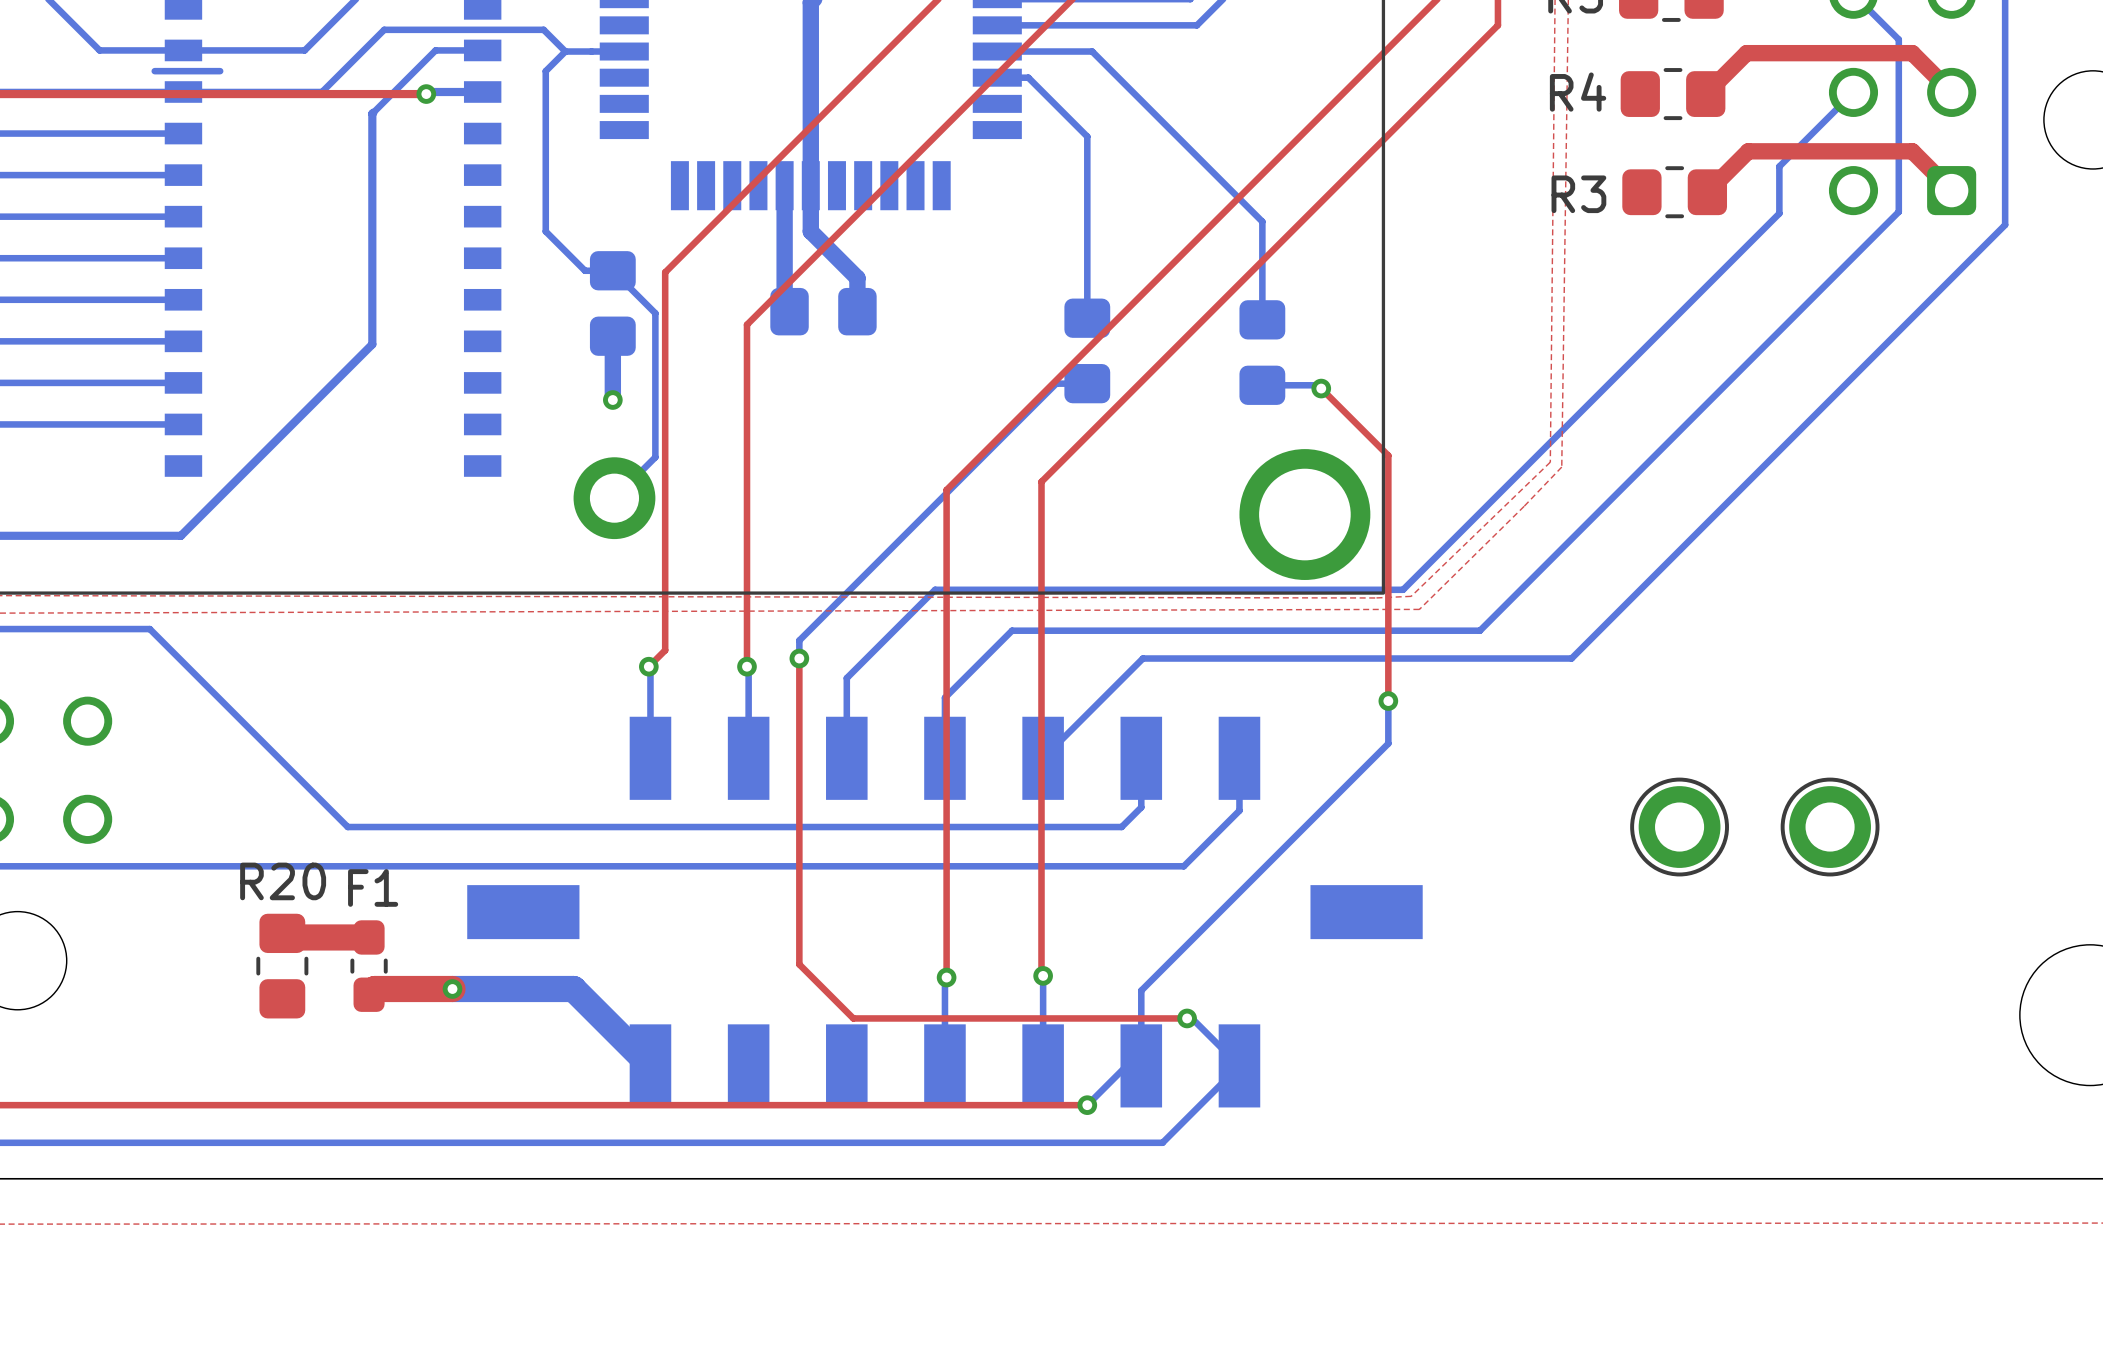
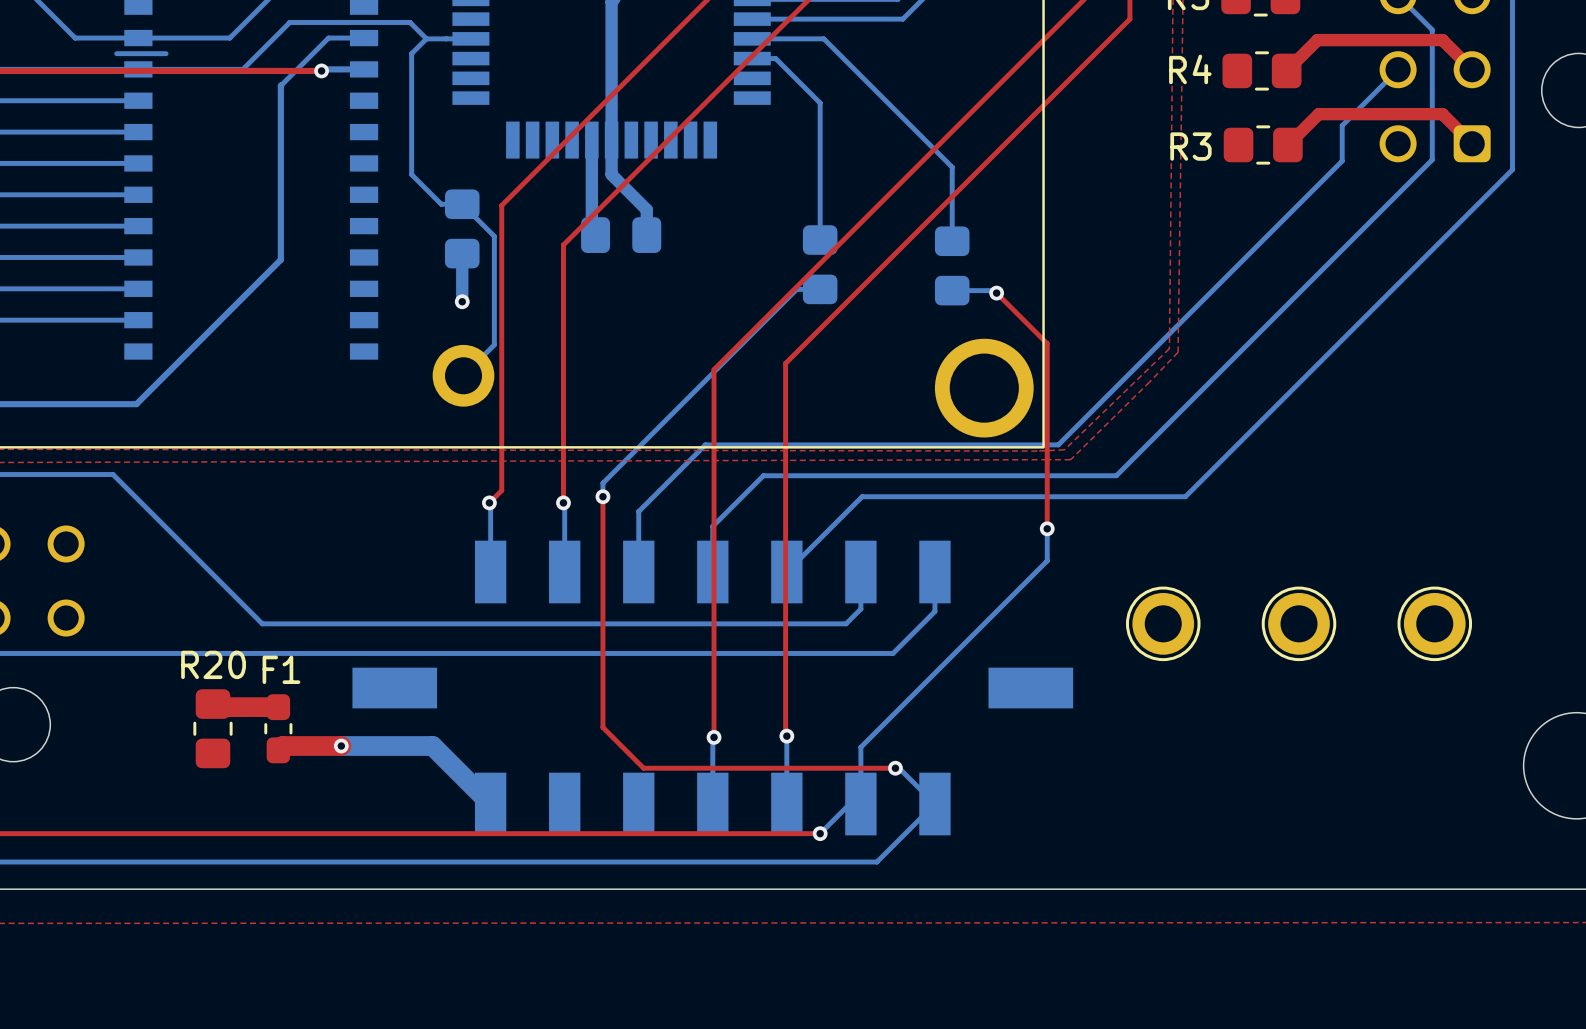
part: none -> (1163, 623)
part position: (1679, 827) -> (1299, 623)
part: (1830, 827) -> none
part: none -> (1434, 623)

